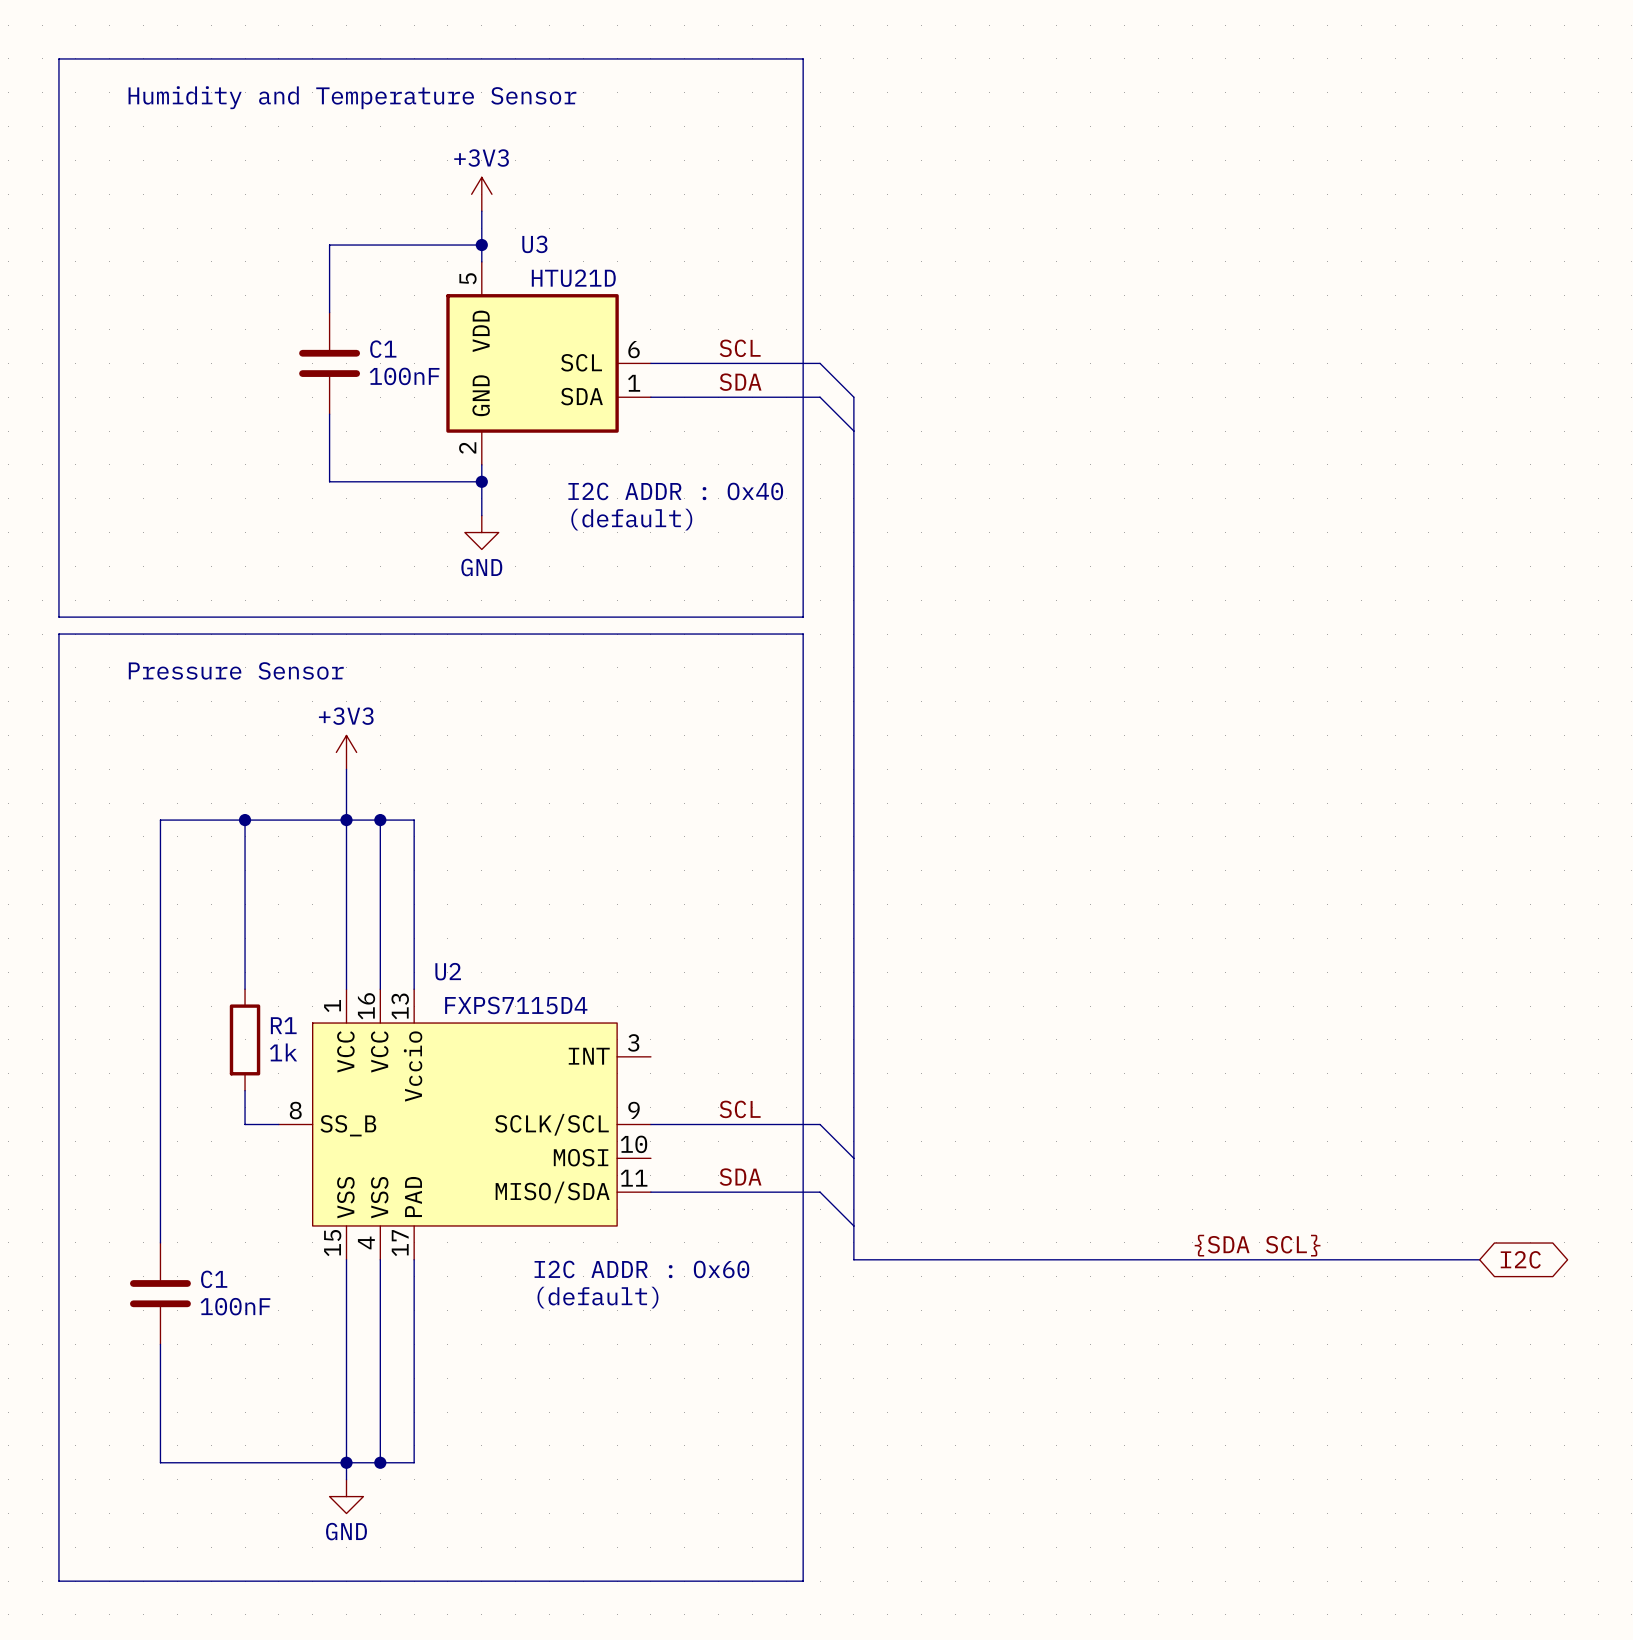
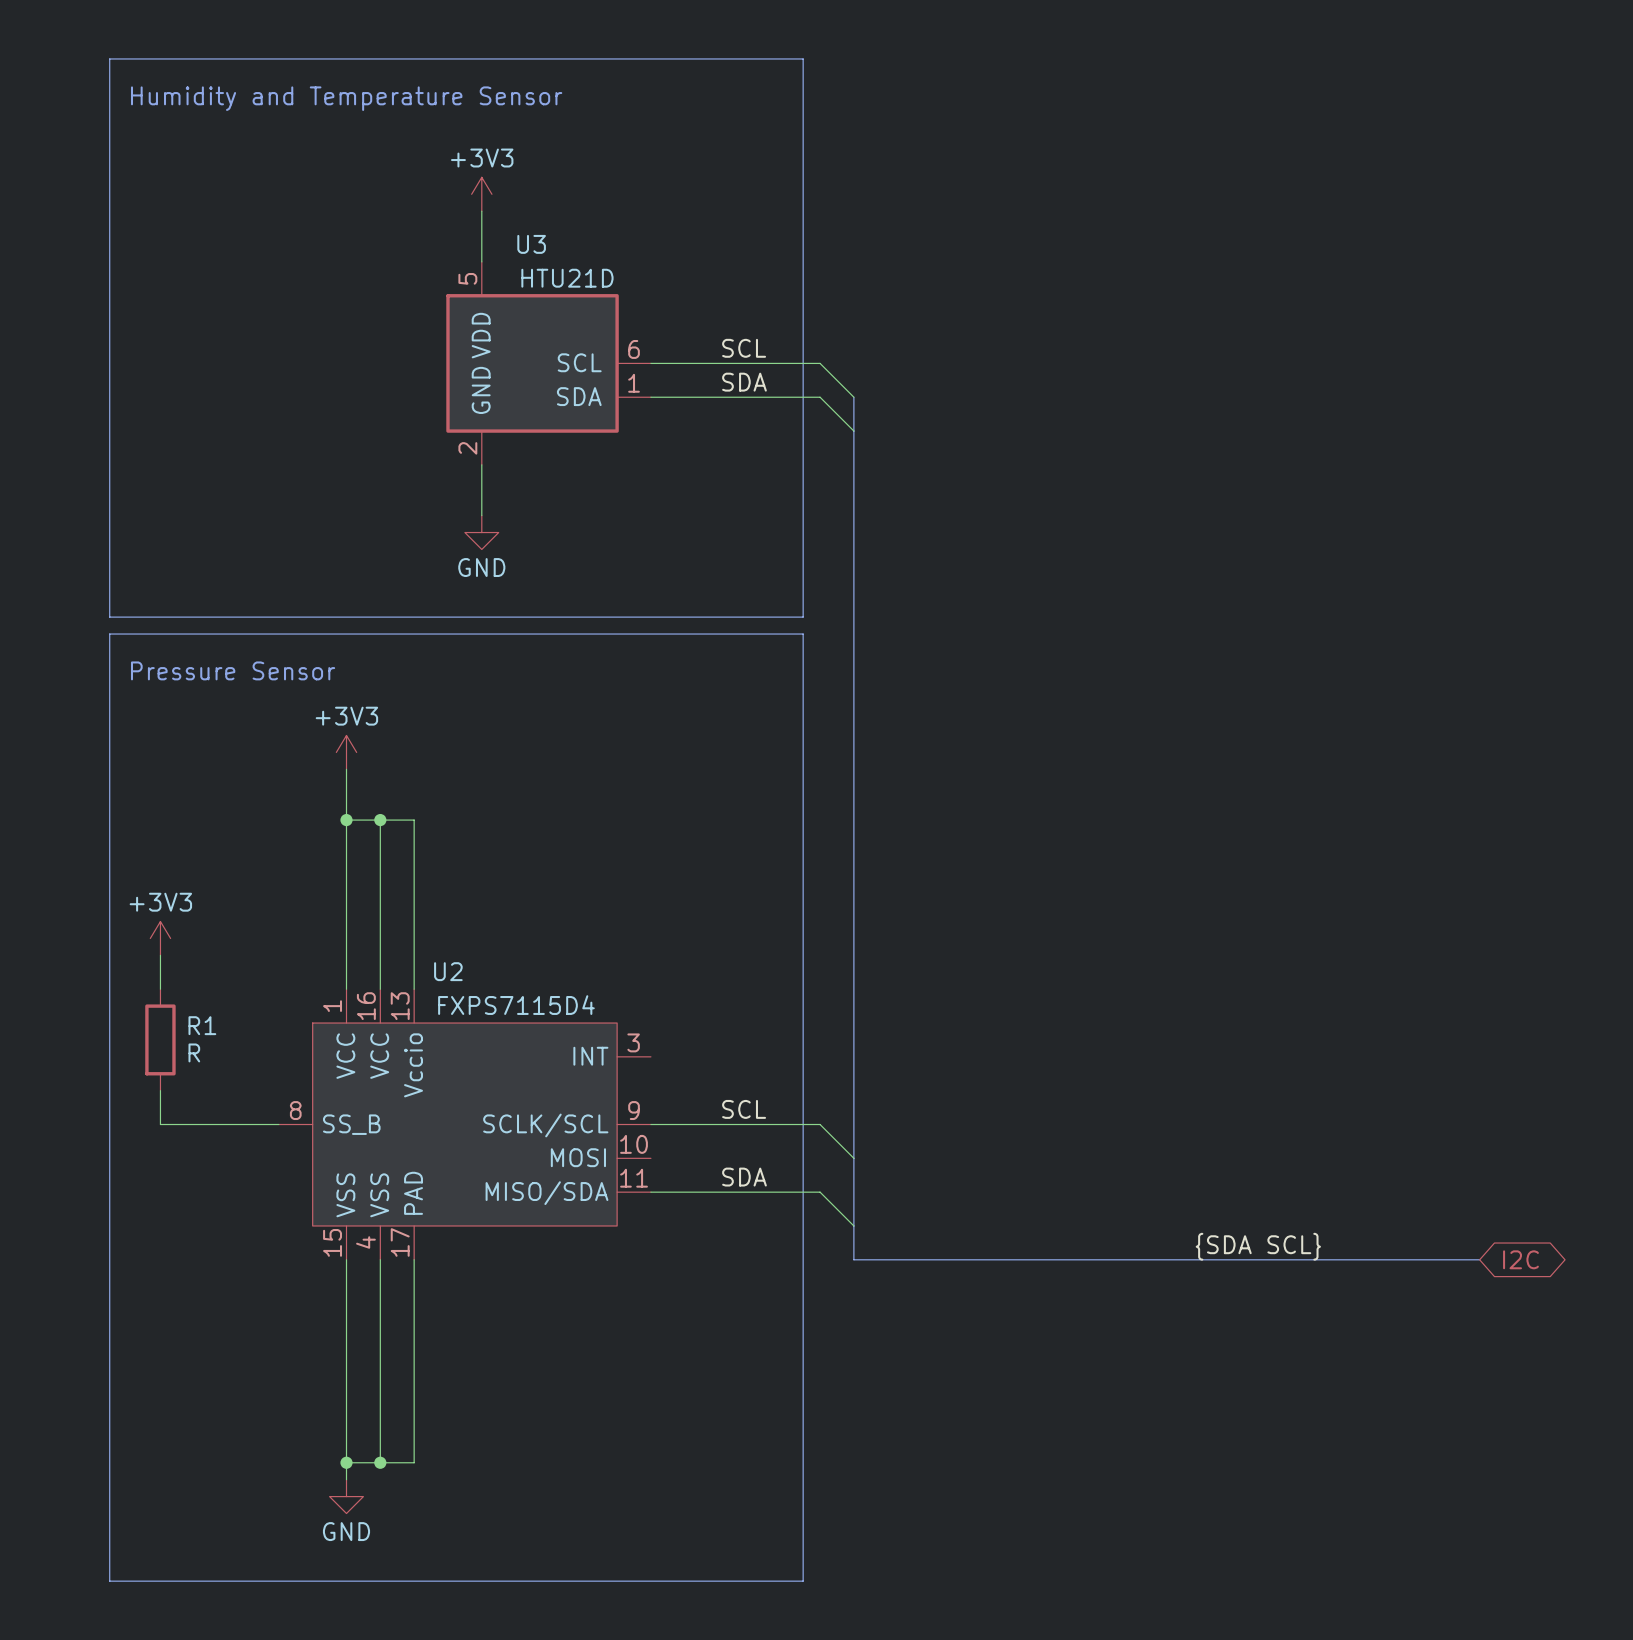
line: (109, 58) (58, 58) (58, 617) (109, 617) -> (109, 58) (109, 617)
wire: (481, 245) (329, 245) (329, 312) -> none
junction: (481, 245) -> none
C1: 100nF (329, 363) -> none
wire: (329, 414) (329, 481) (481, 481) -> none
junction: (481, 481) -> none
text: I2C ADDR : Ox40 (675, 491) -> none
text: (default) (631, 519) -> none
line: (109, 634) (58, 634) (58, 1581) (109, 1581) -> (109, 634) (109, 1581)
wire: (245, 820) (245, 989) -> none
junction: (245, 820) -> none
wire: (346, 820) (160, 820) (160, 955) -> none
power symbol: none -> +3V3 (160, 938)
wire: (160, 989) (160, 1090) -> none
R1 position: (245, 1039) -> (160, 1039)
R1 value: 1k (283, 1052) -> R (194, 1052)
wire: (245, 1090) (245, 1124) -> (160, 1124) (245, 1124)
wire: (160, 1124) (160, 1242) -> none
text: I2C ADDR : Ox60 (641, 1269) -> none
C1: 100nF (160, 1293) -> none
text: (default) (597, 1297) -> none
wire: (160, 1344) (160, 1462) (346, 1462) -> none

